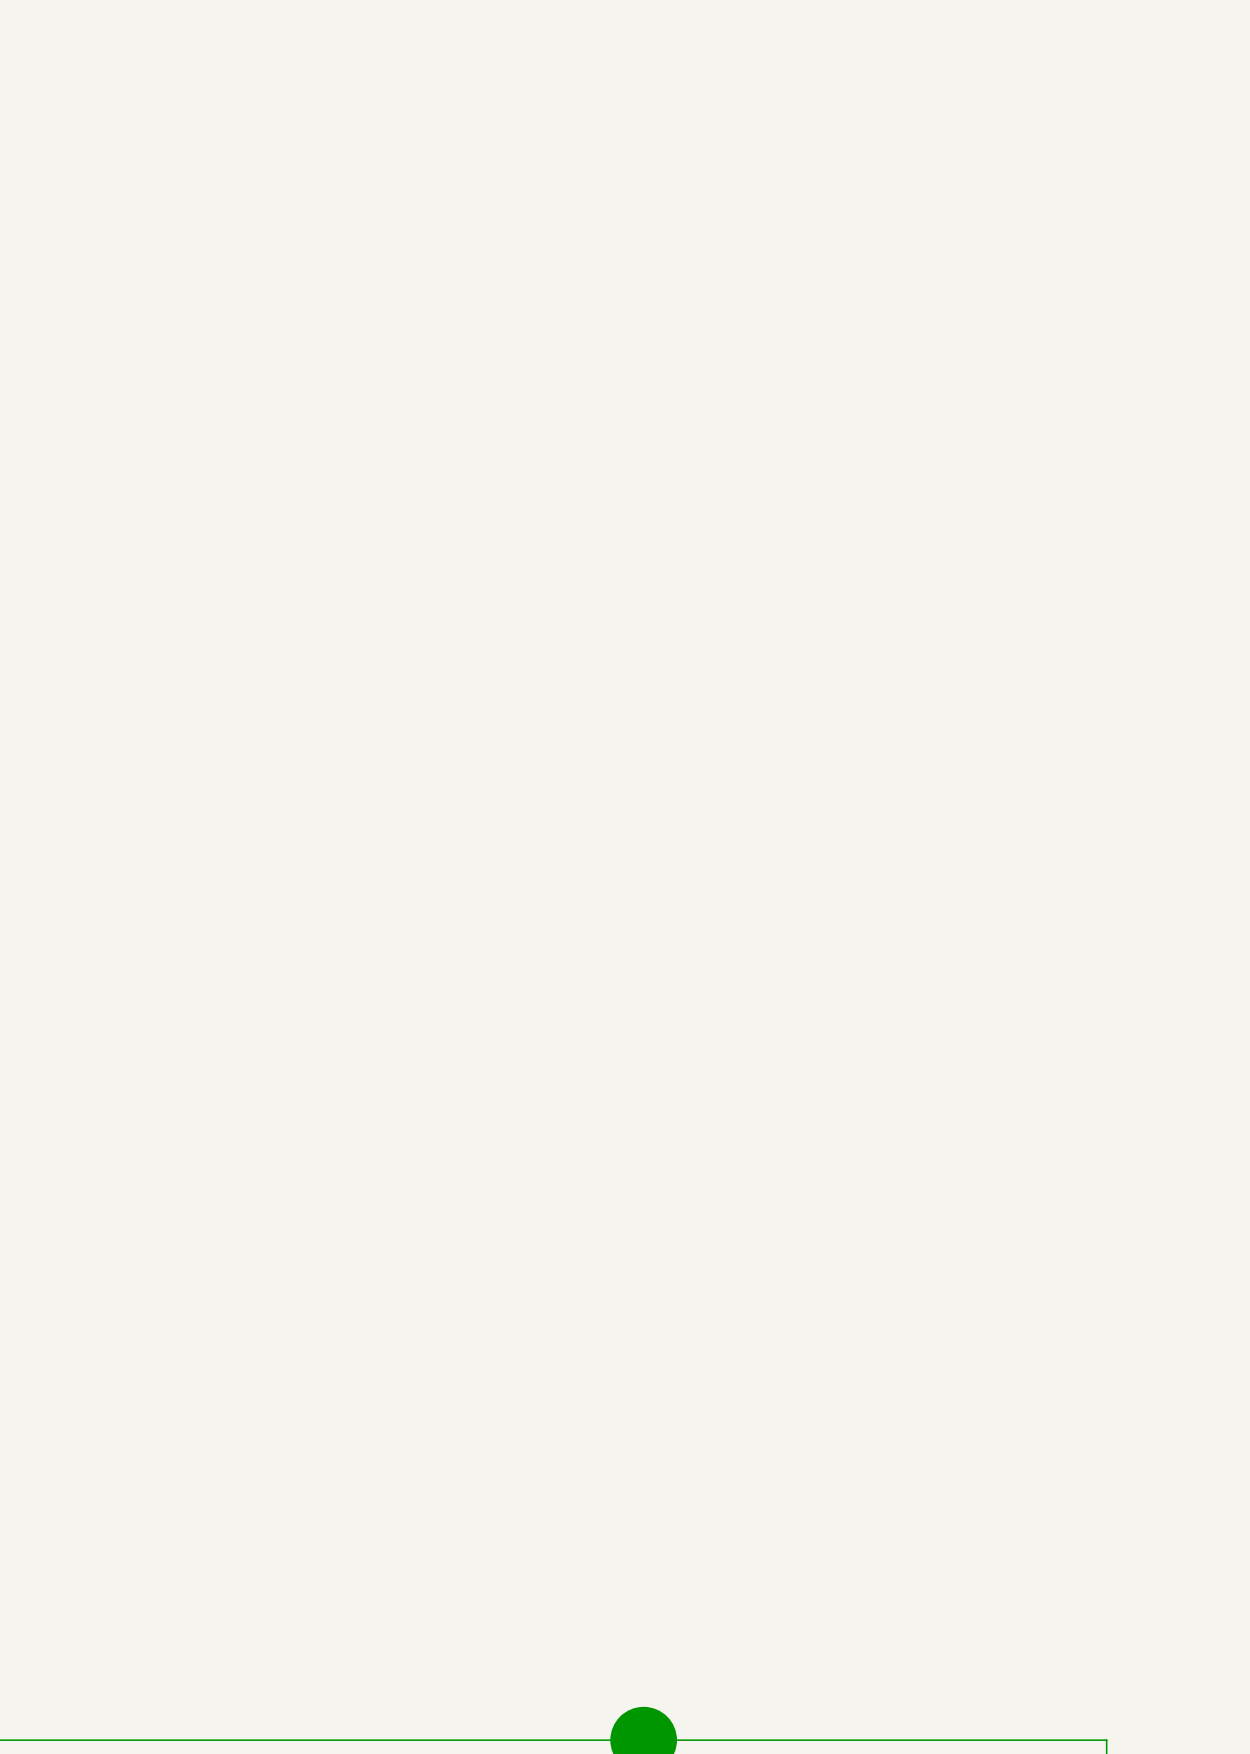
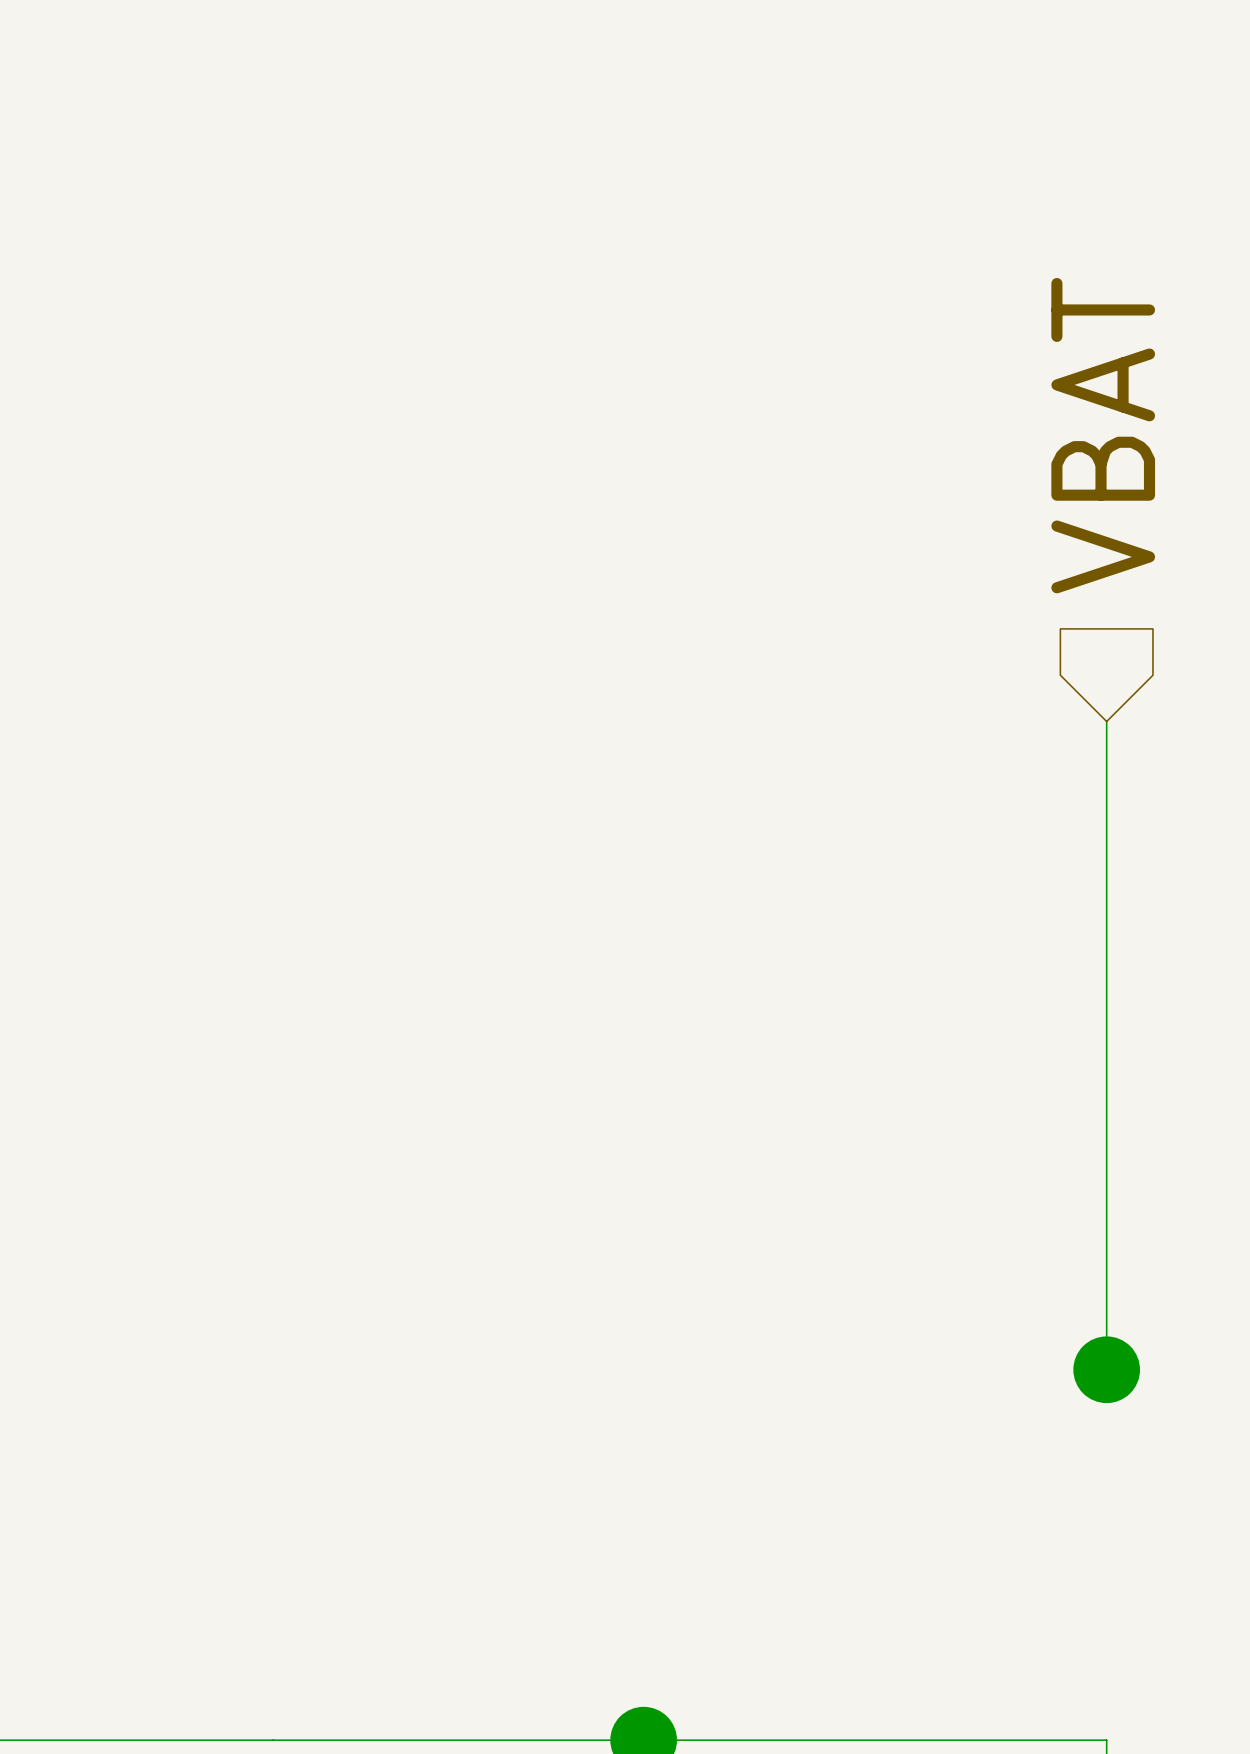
hierarchical label: none -> VBAT (1103, 435)
wire: none -> (1106, 721) (1106, 1369)
junction: none -> (1106, 1369)

